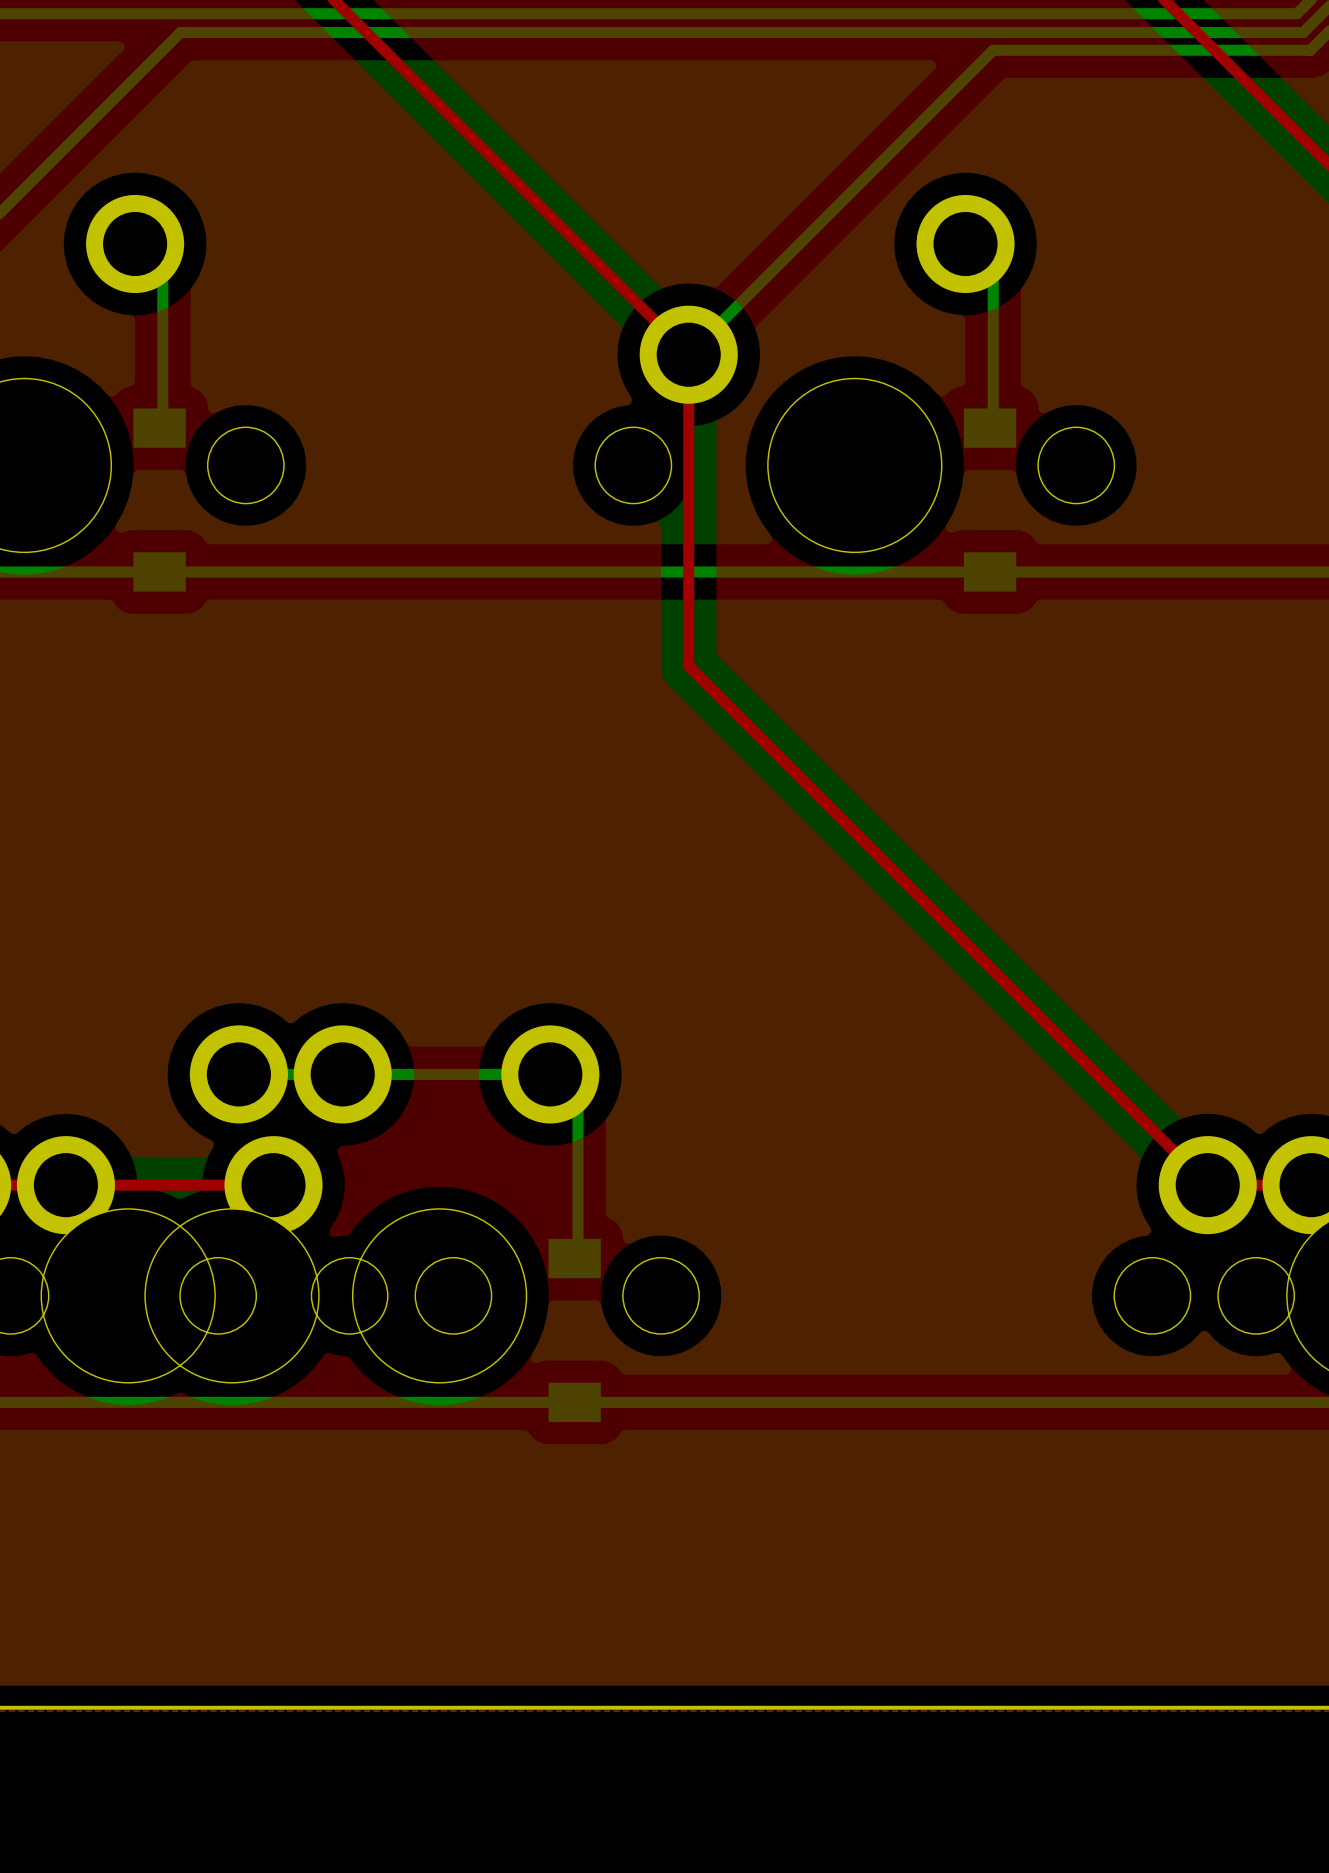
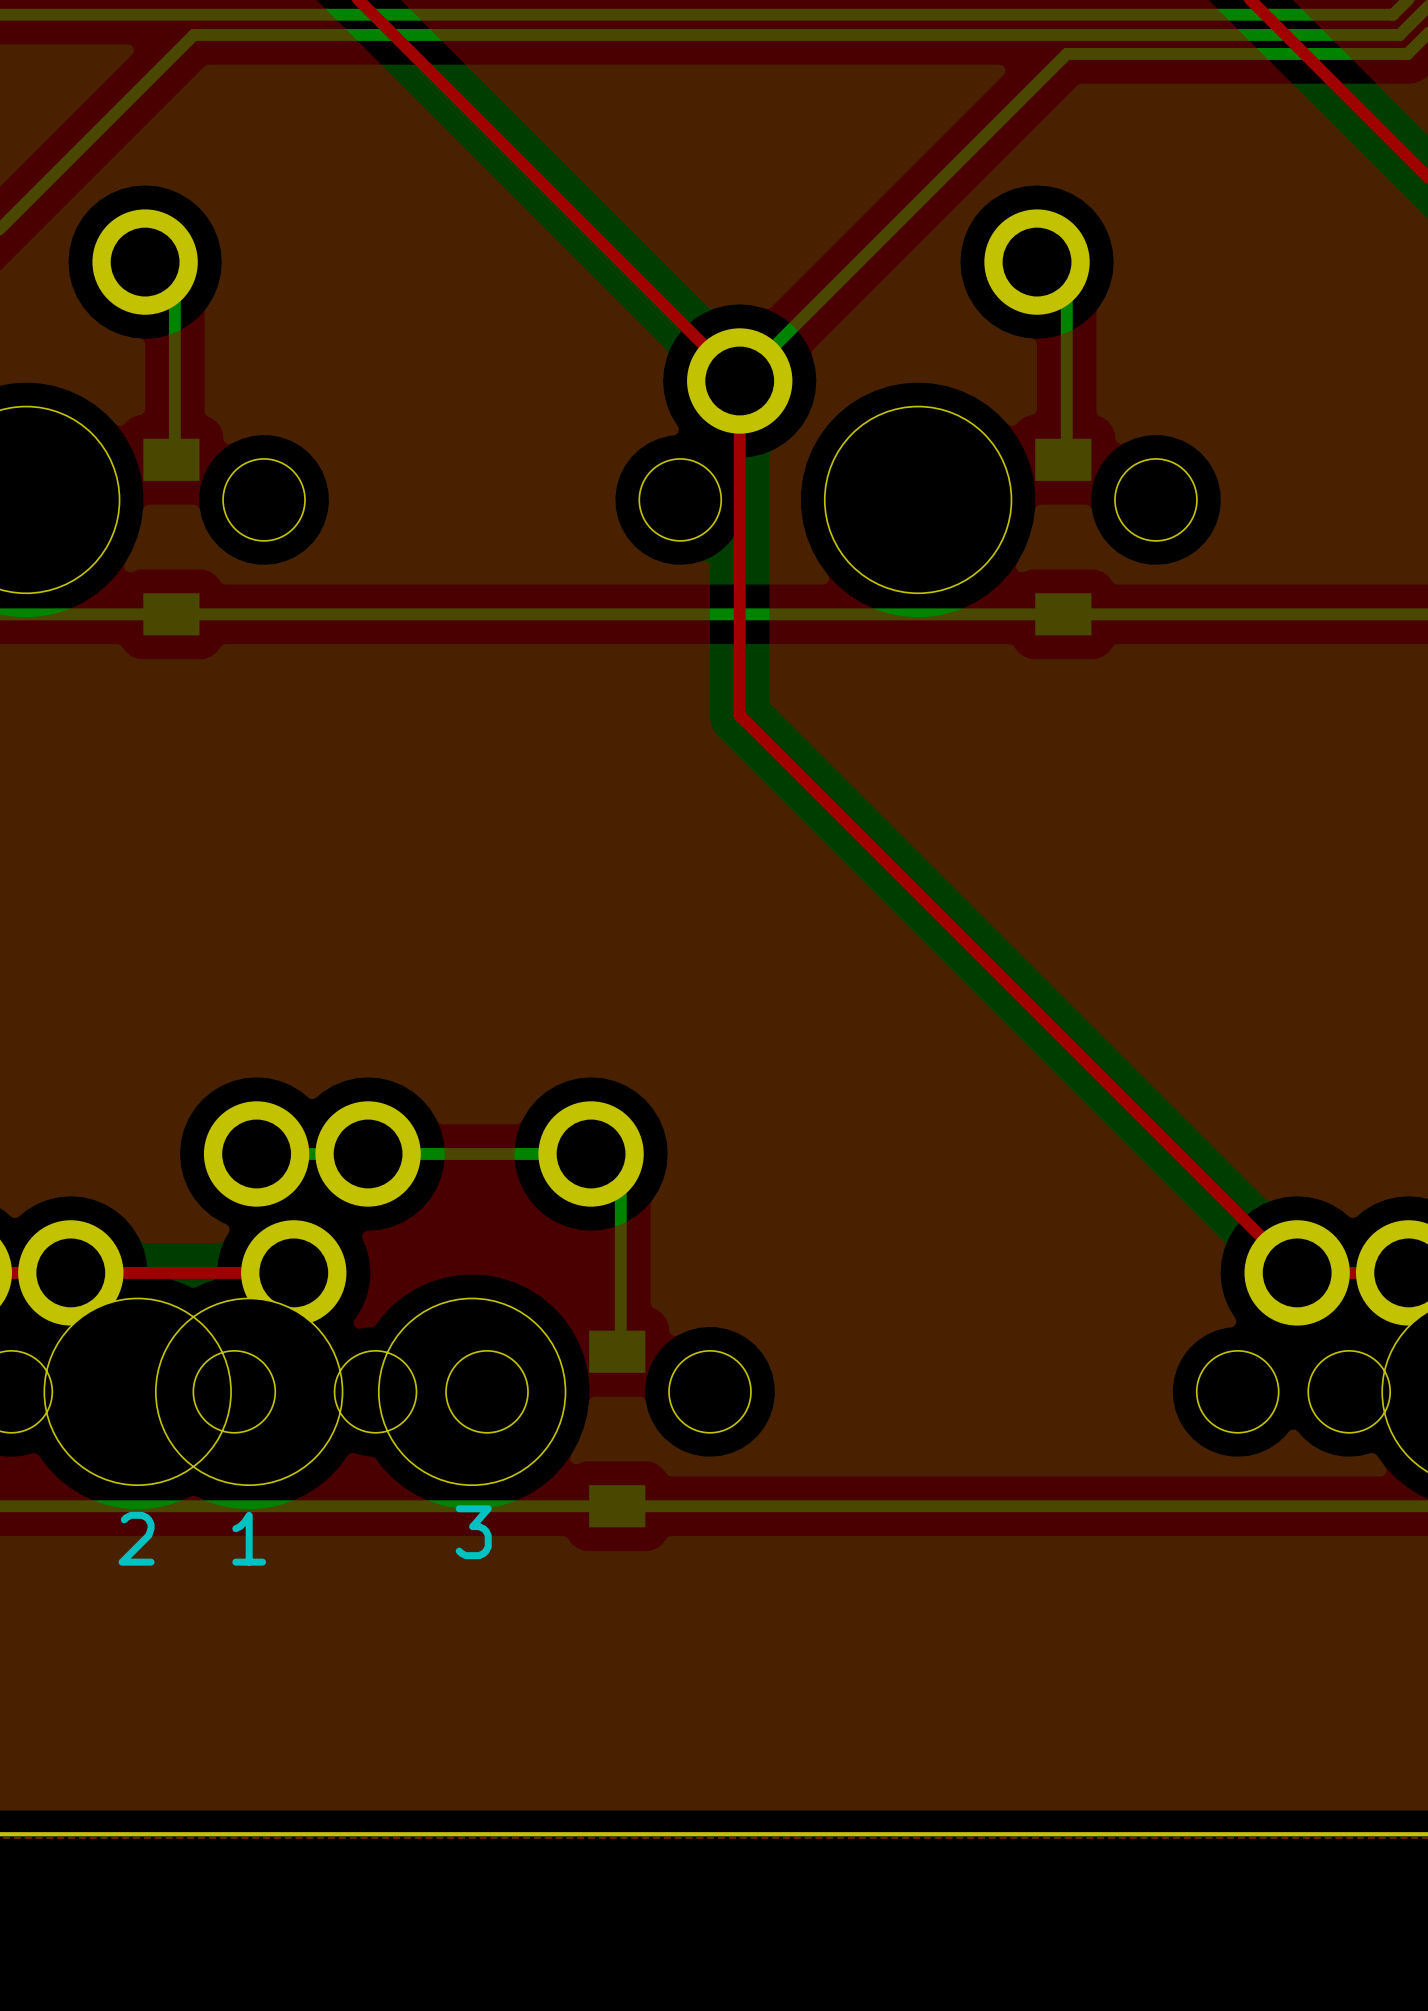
text: none -> 3 (473, 1532)
text: none -> 2 (136, 1538)
text: none -> 1 (249, 1538)

